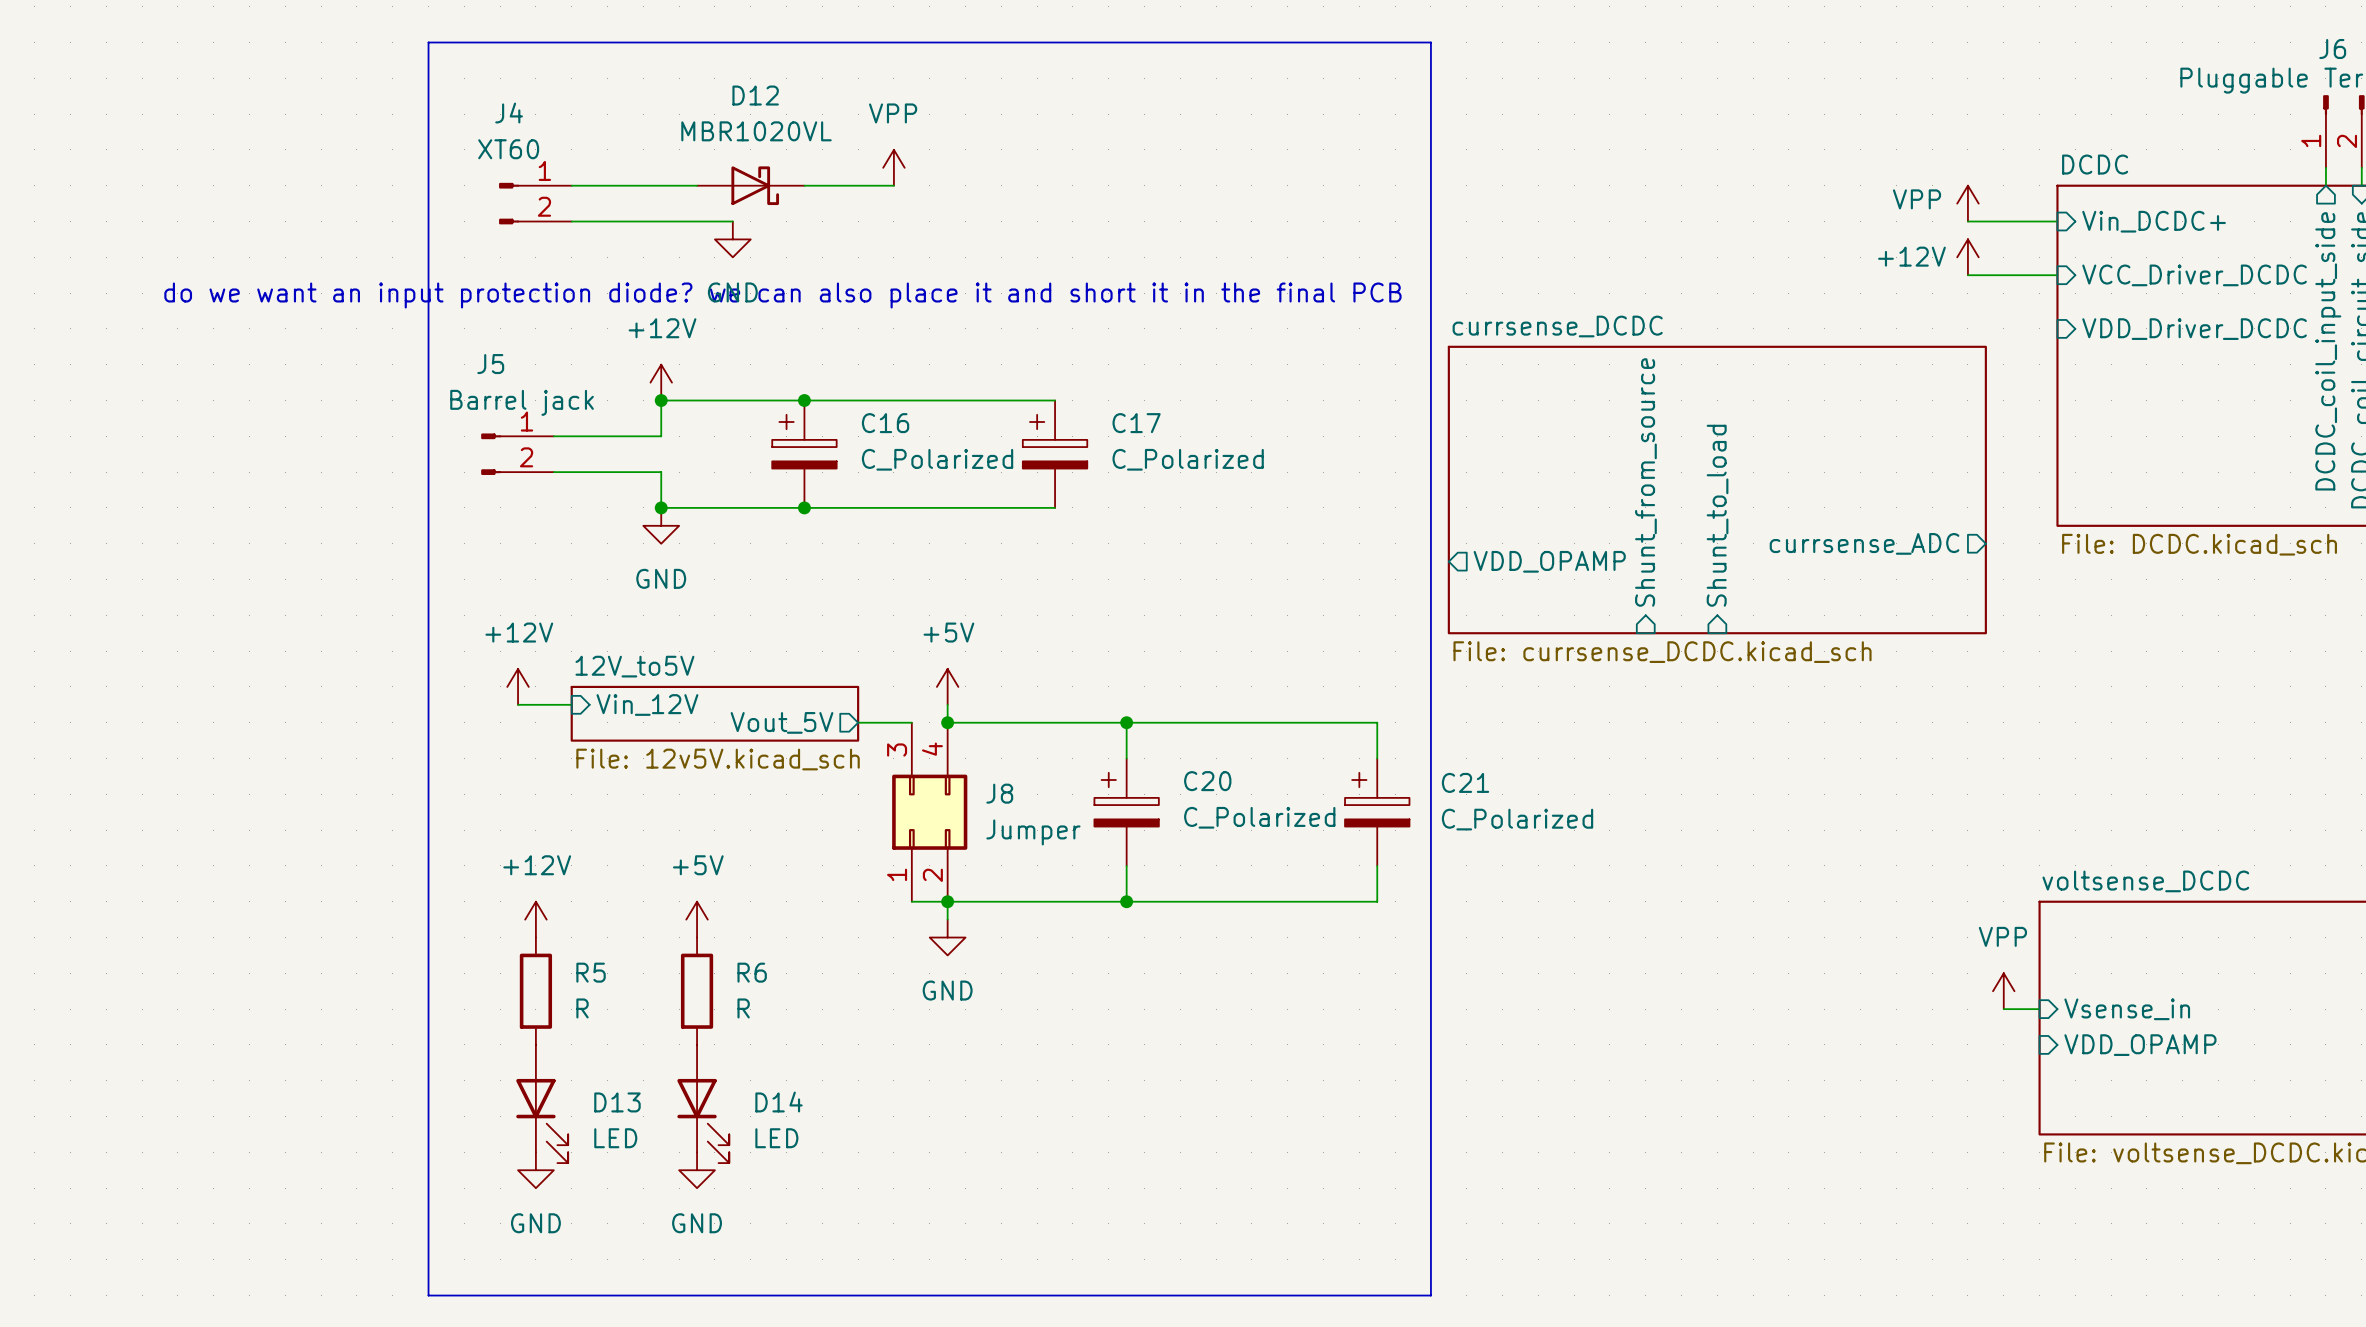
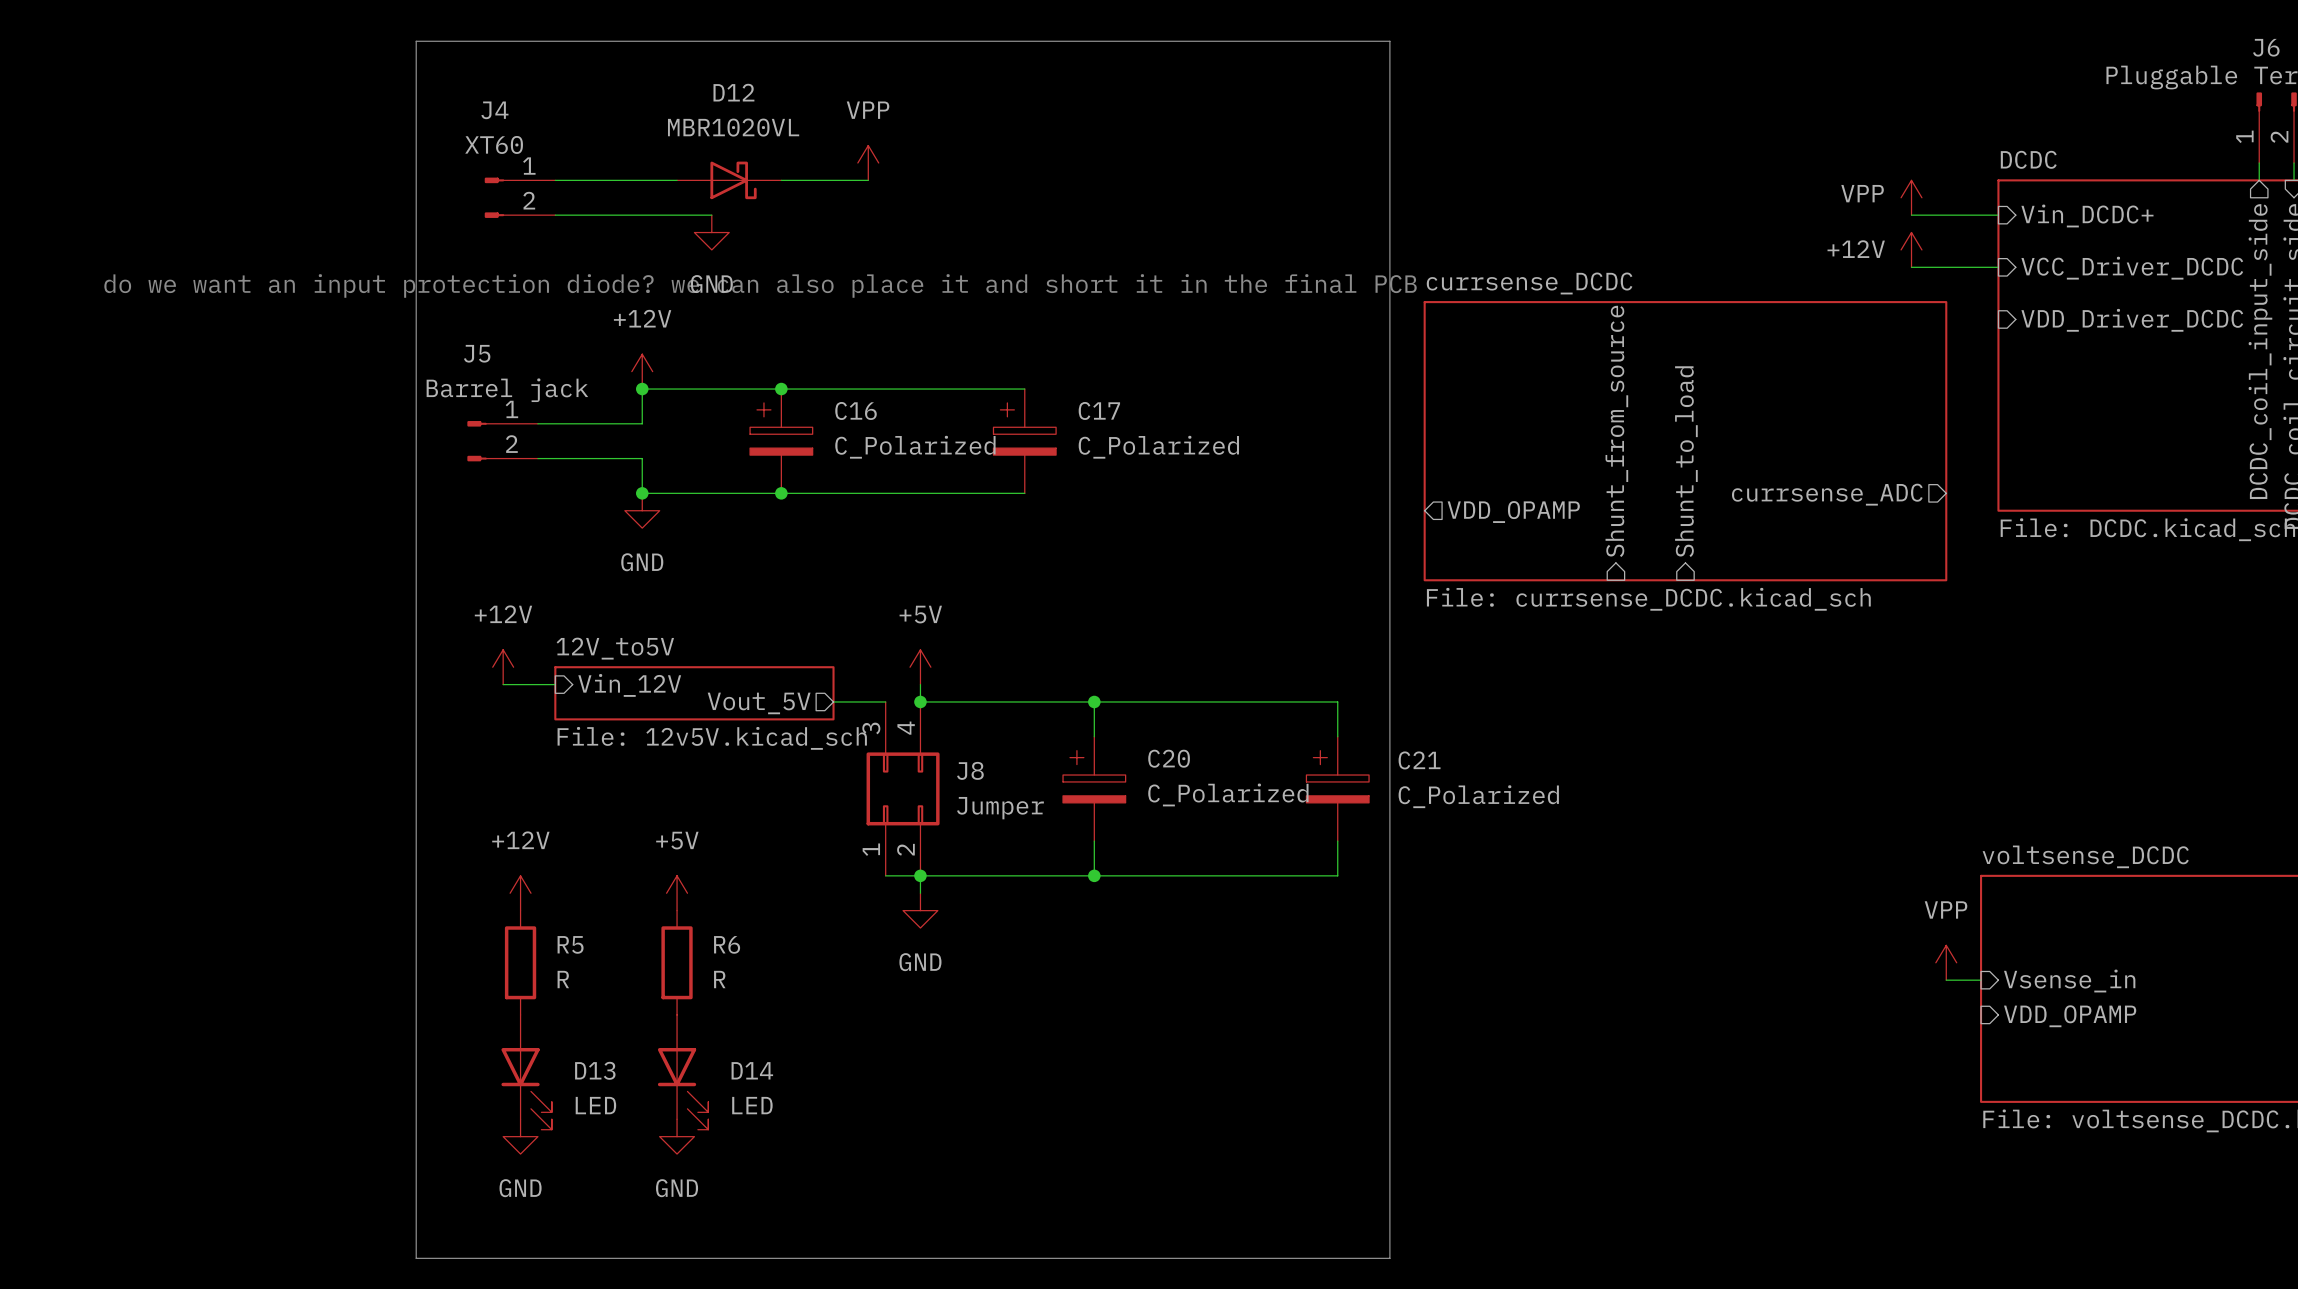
sheet pin position: Shunt_from_source (1645, 482) -> Shunt_from_source (1616, 431)
sheet currsense_DCDC position: (1717, 490) -> (1685, 441)
sheet pin position: Shunt_to_load (1717, 515) -> Shunt_to_load (1686, 461)
sheet pin position: currsense_ADC (1864, 543) -> currsense_ADC (1827, 494)
sheet pin position: VDD_OPAMP (1549, 561) -> VDD_OPAMP (1513, 512)

